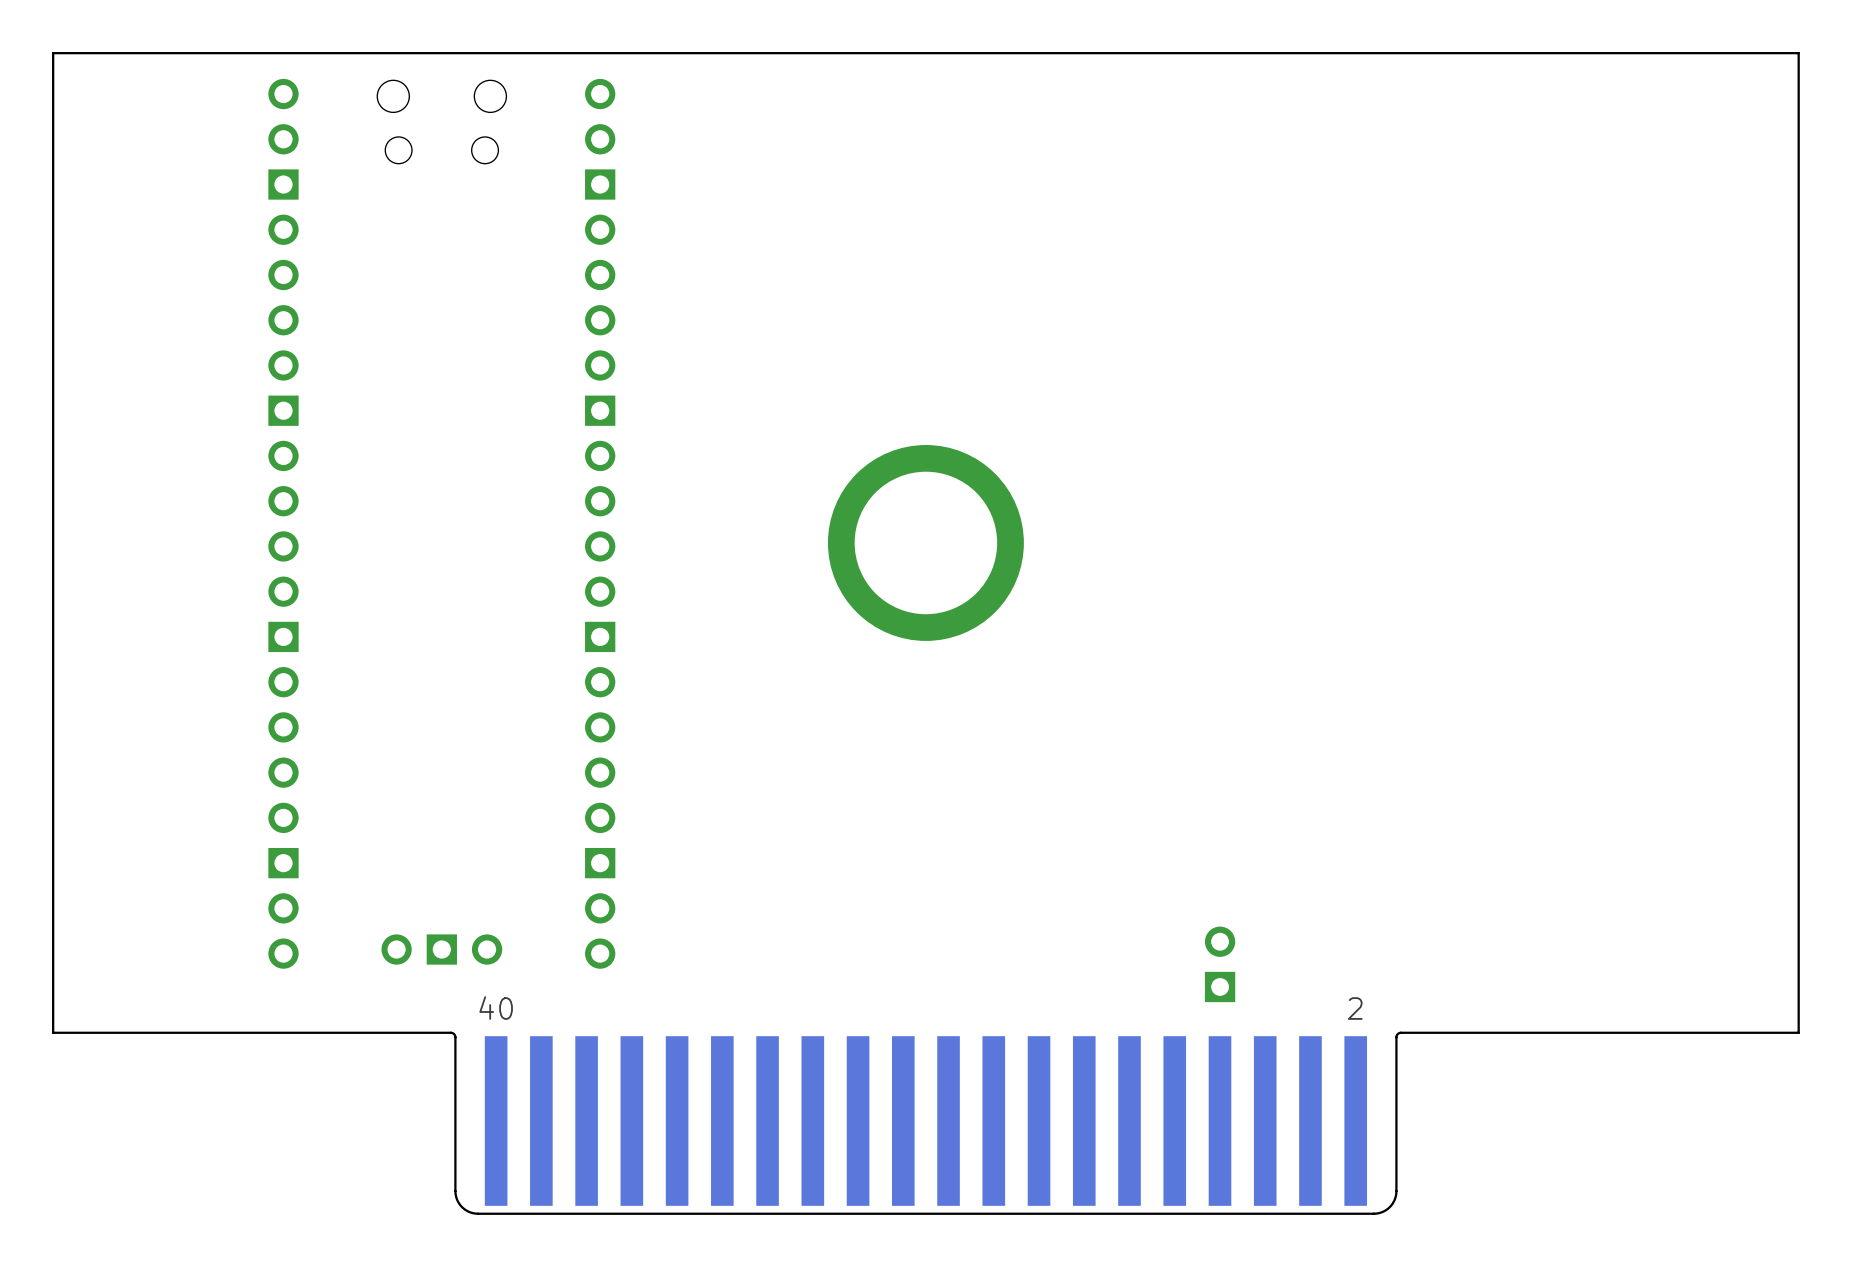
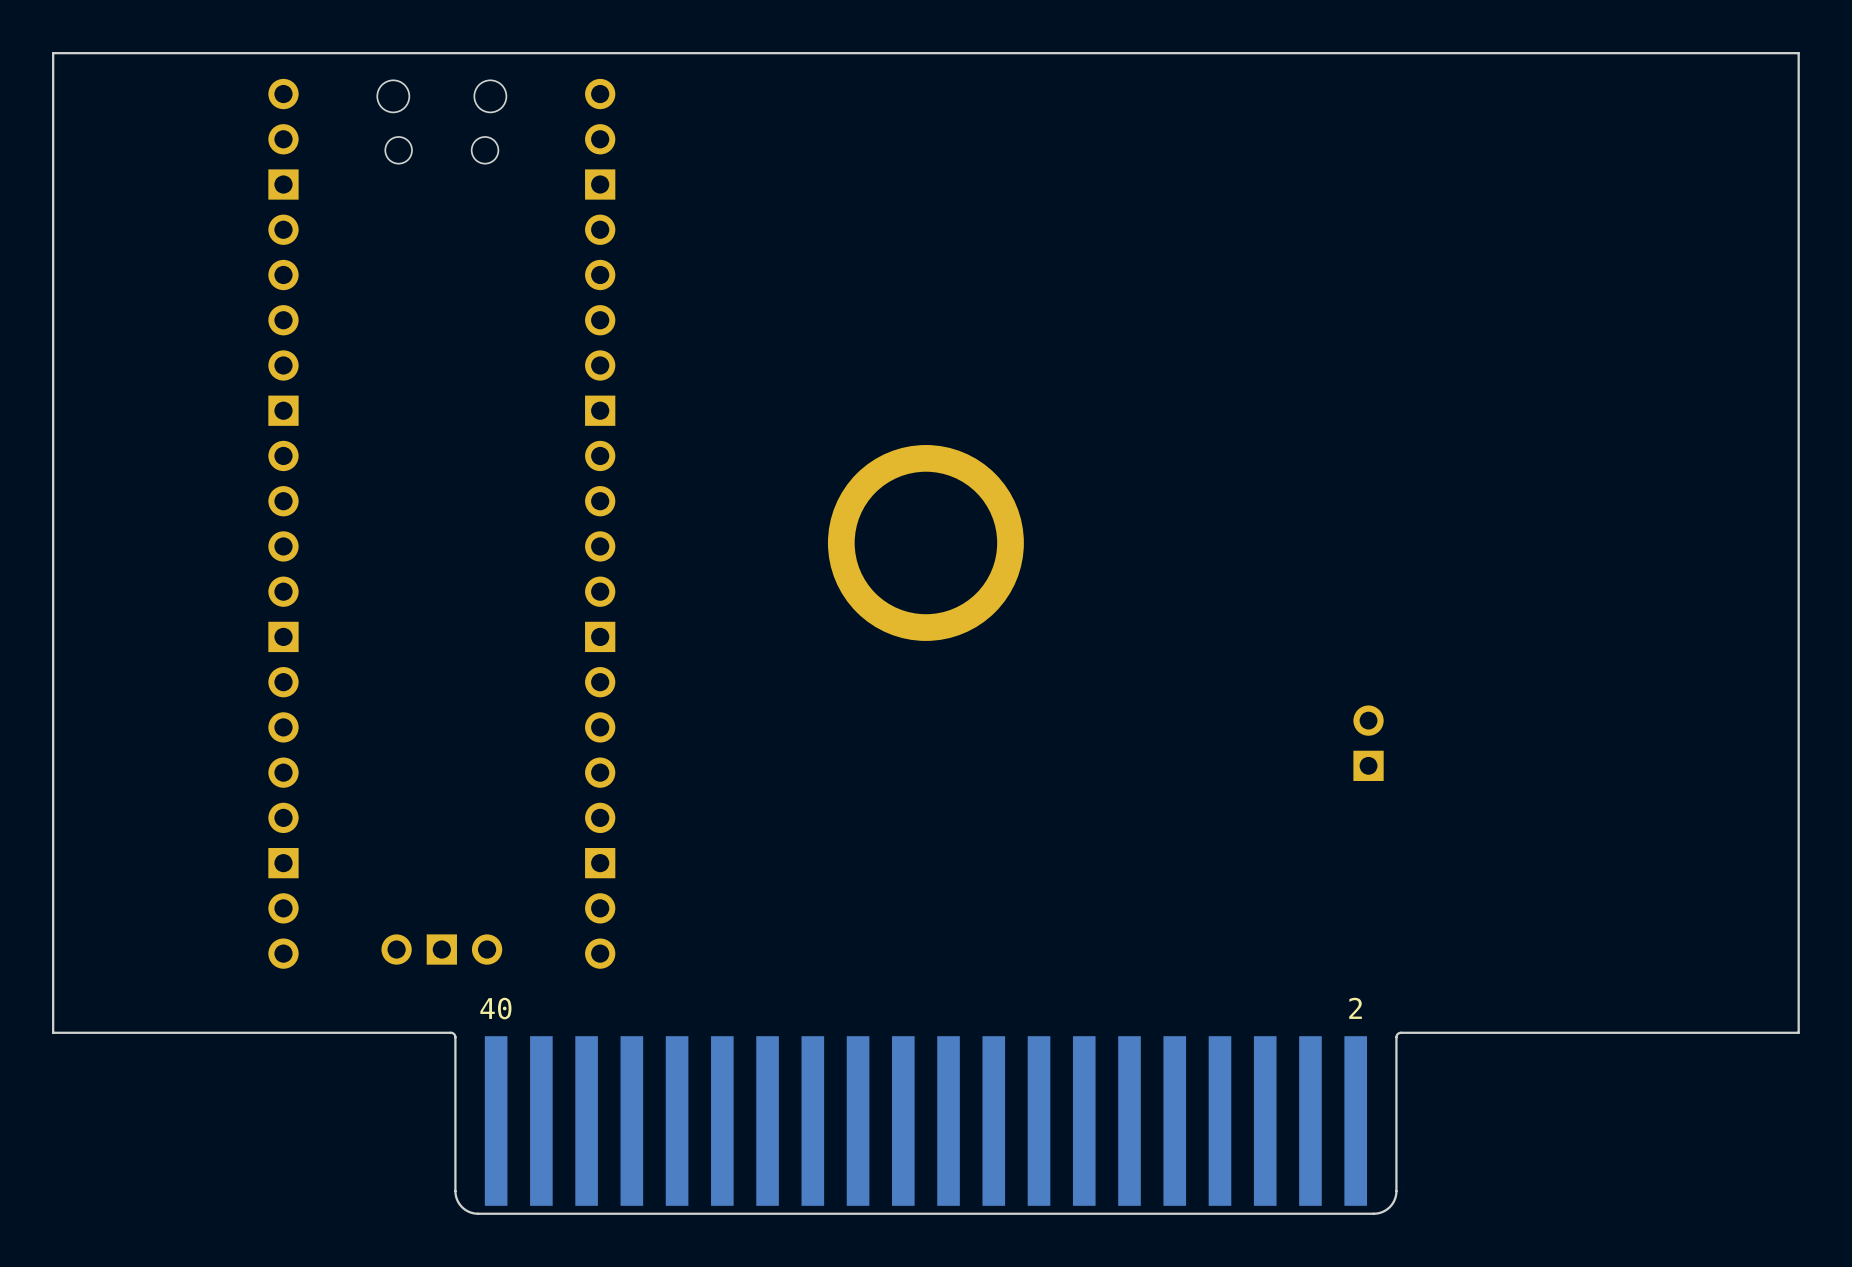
part position: (1220, 964) -> (1368, 743)

